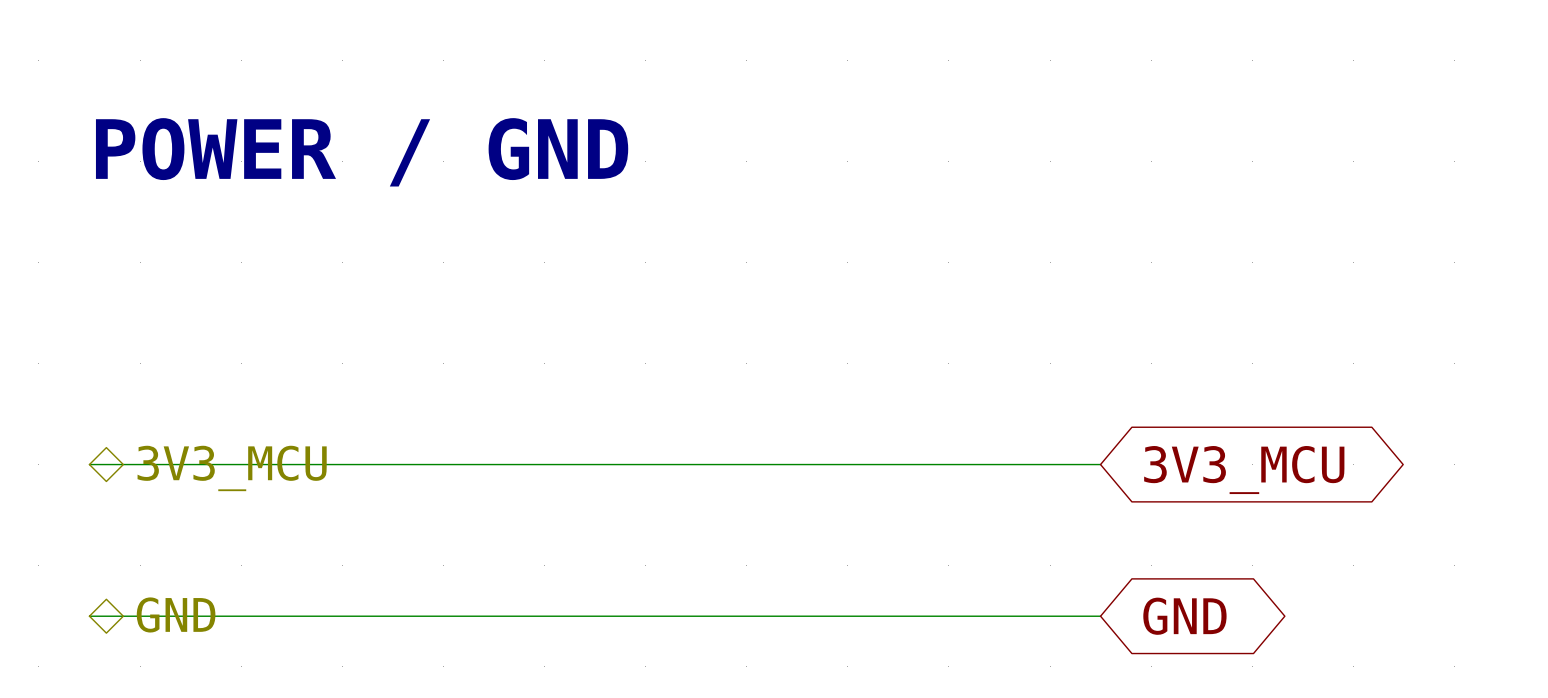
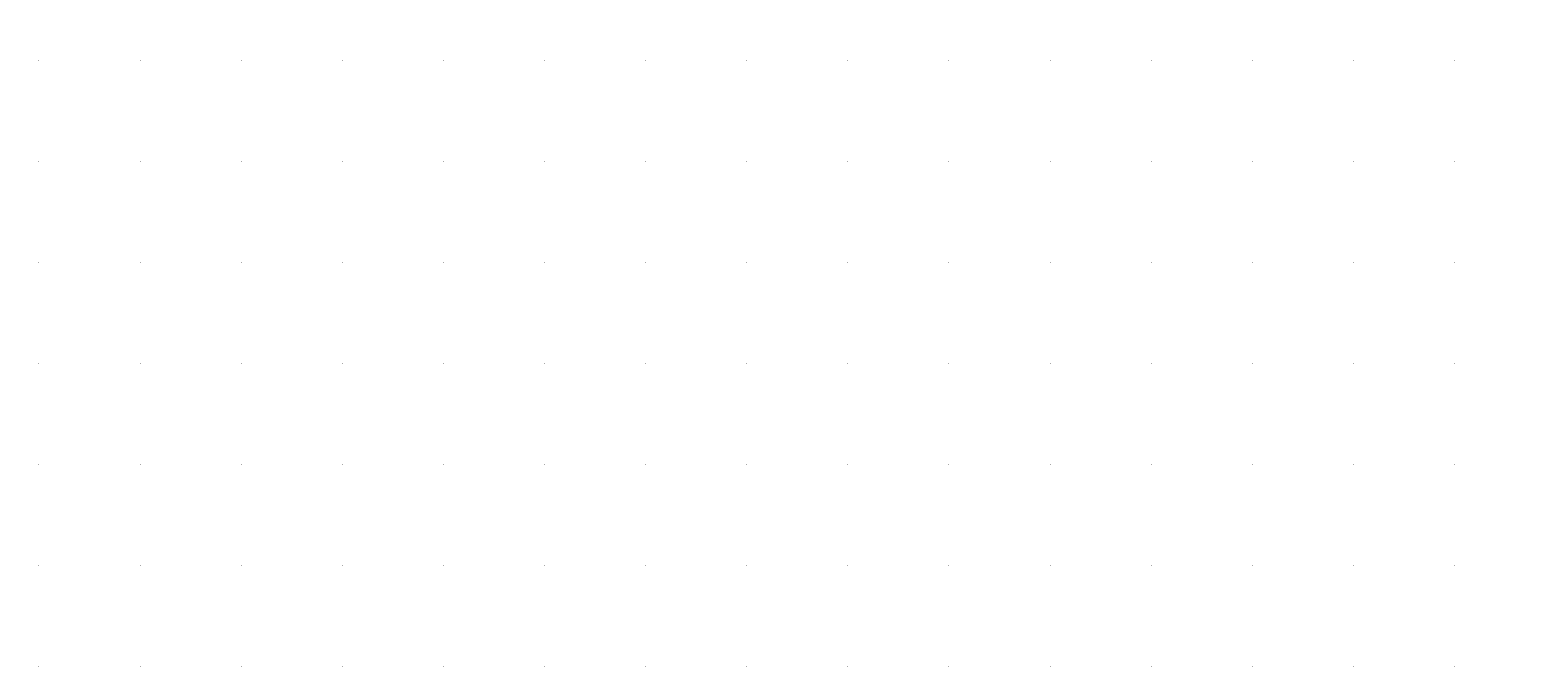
text: POWER / GND (362, 152) -> none
wire: (89, 464) (1100, 464) -> none
hierarchical label: 3V3_MCU (232, 468) -> none
global label: 3V3_MCU (1244, 470) -> none
hierarchical label: GND (176, 614) -> none
wire: (89, 616) (1100, 616) -> none
global label: GND (1184, 616) -> none

